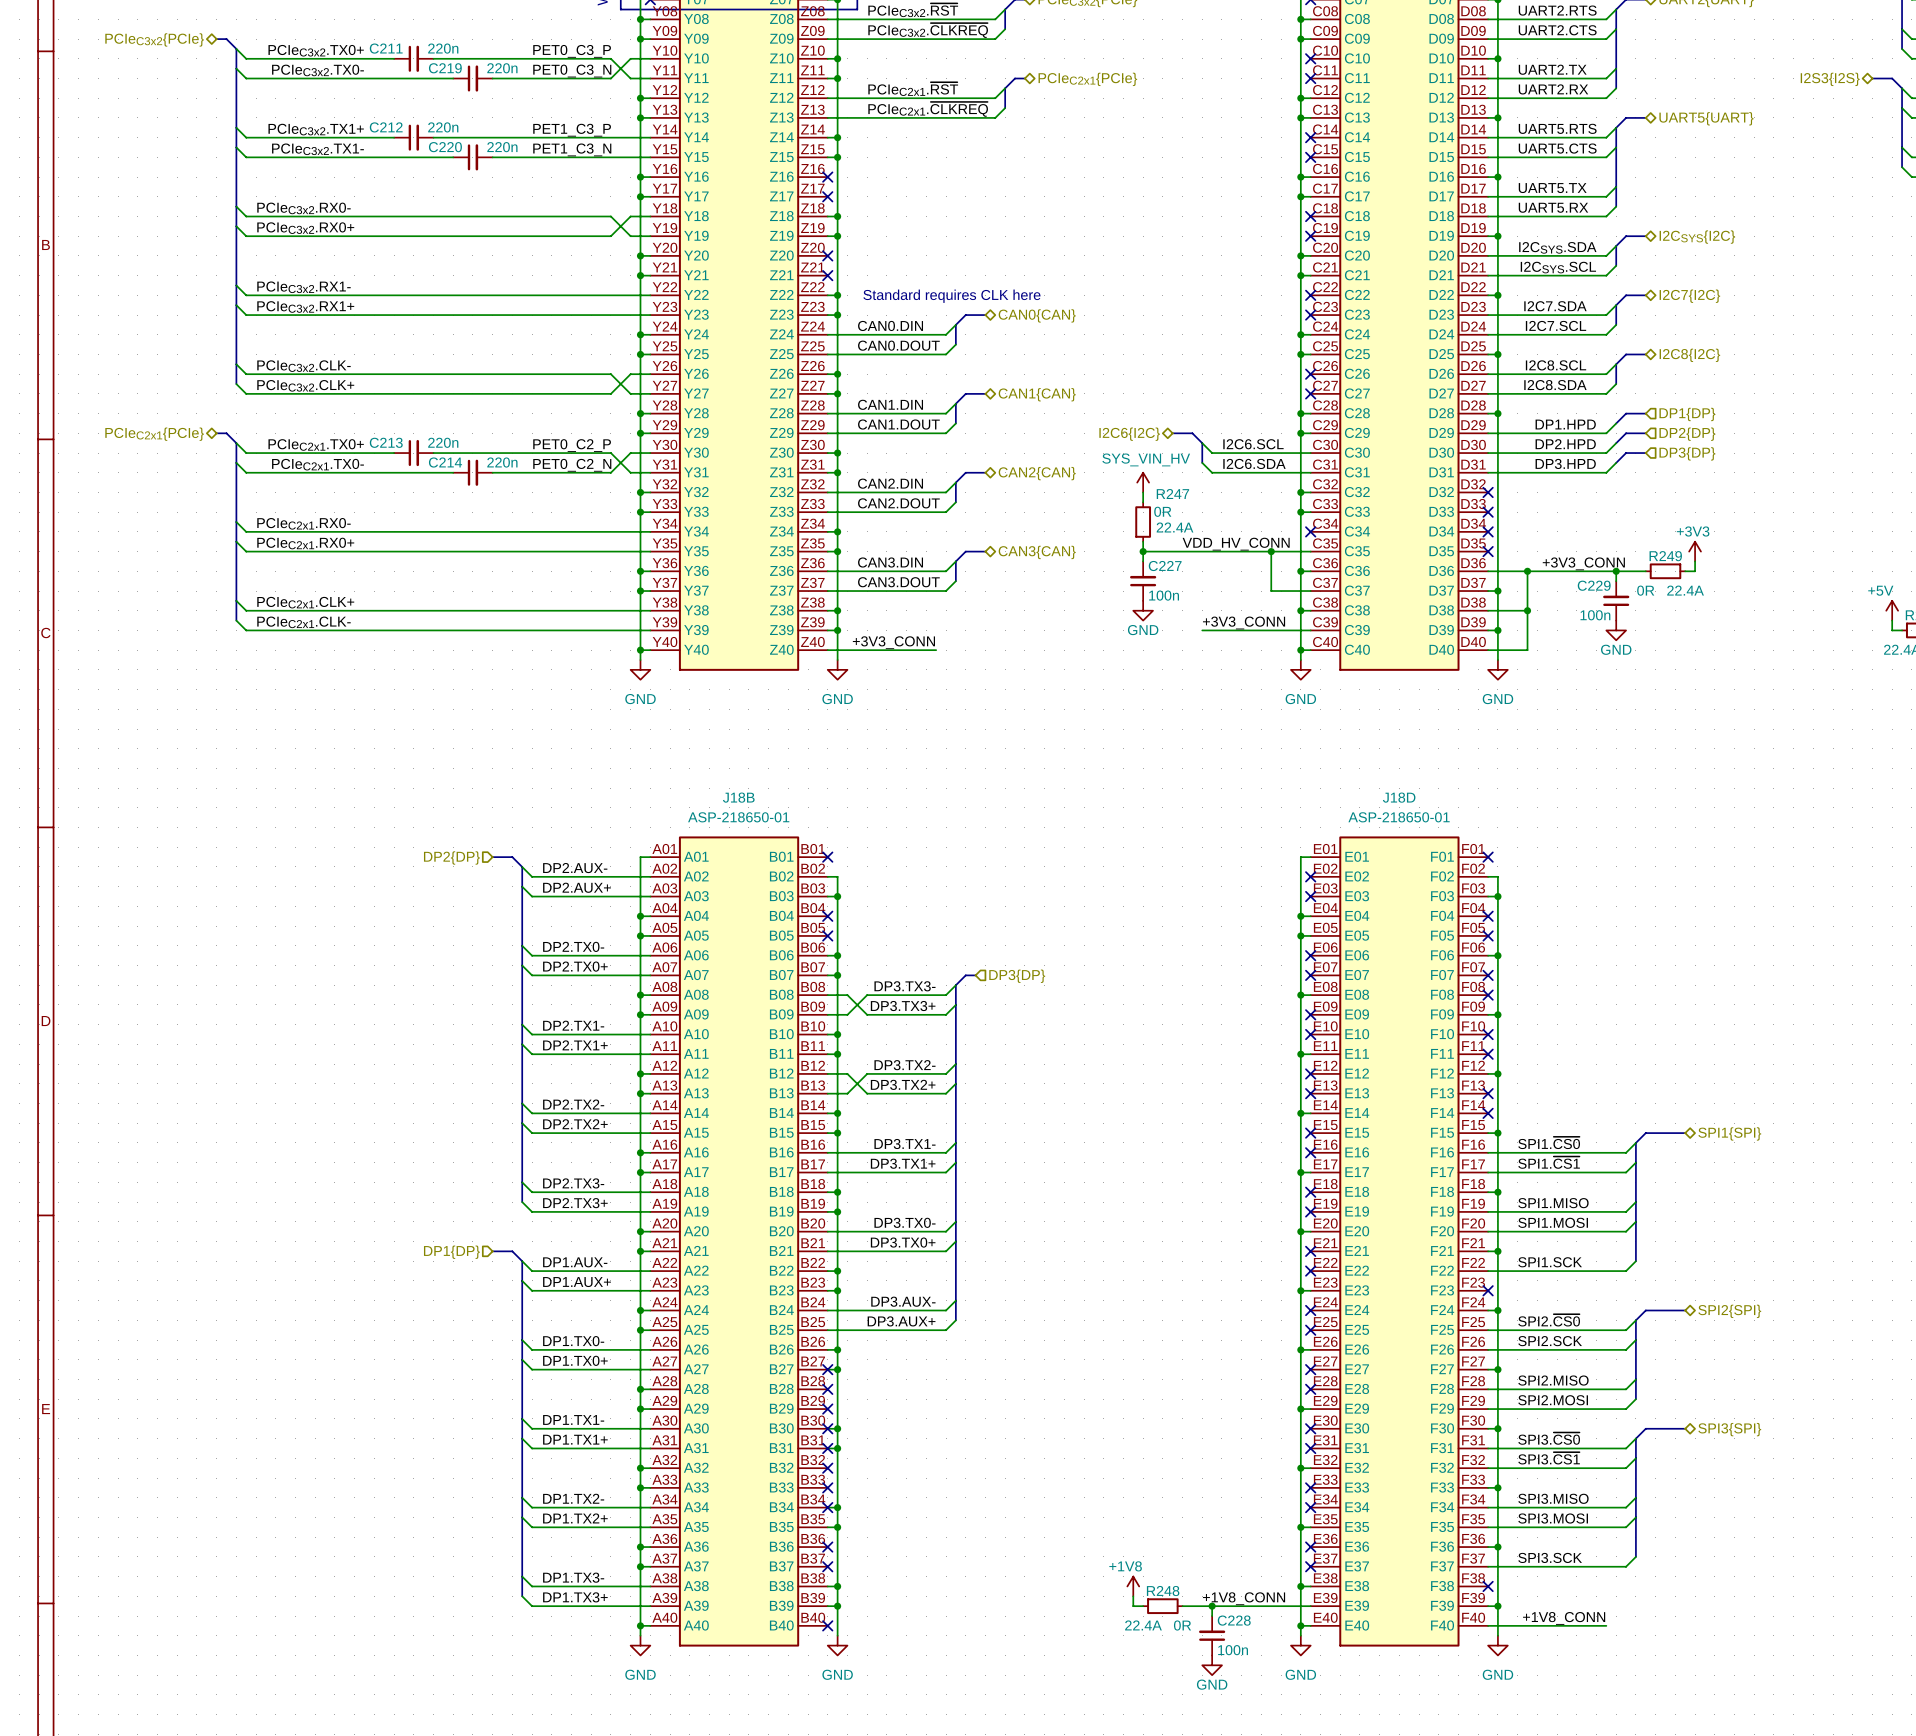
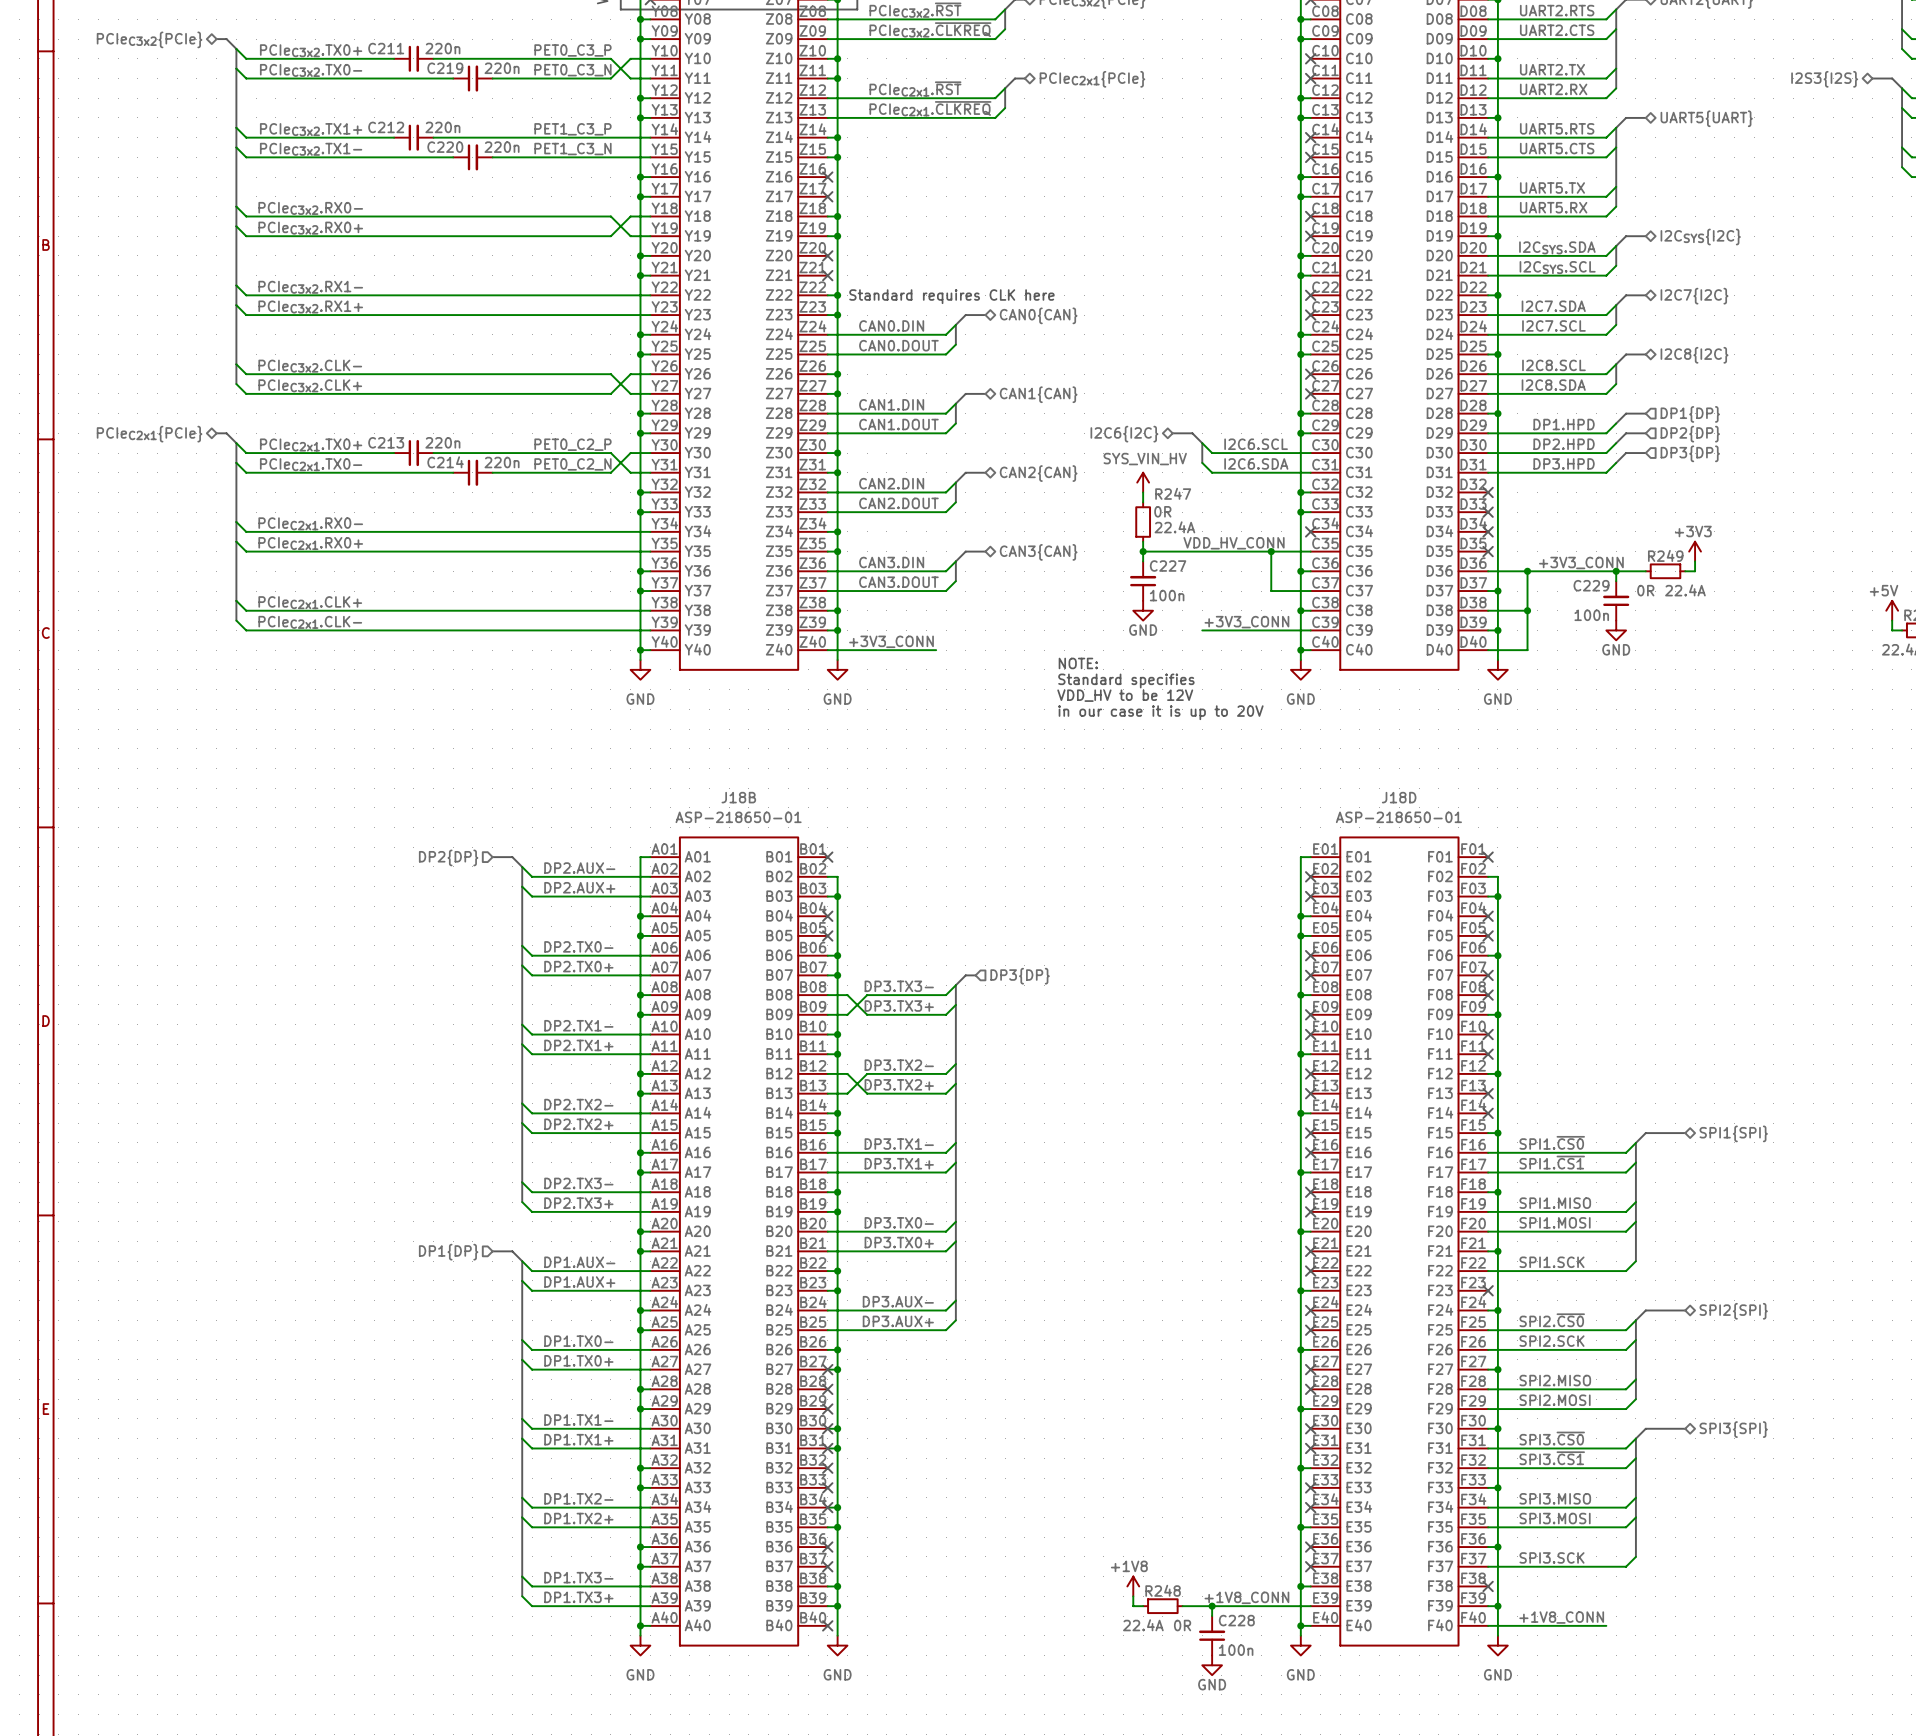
text: none -> NOTE: (1078, 663)
text: none -> Standard specifies (1126, 680)
text: none -> VDD_HV to be 12V (1125, 695)
text: none -> in our case it is up to 20V (1160, 712)

